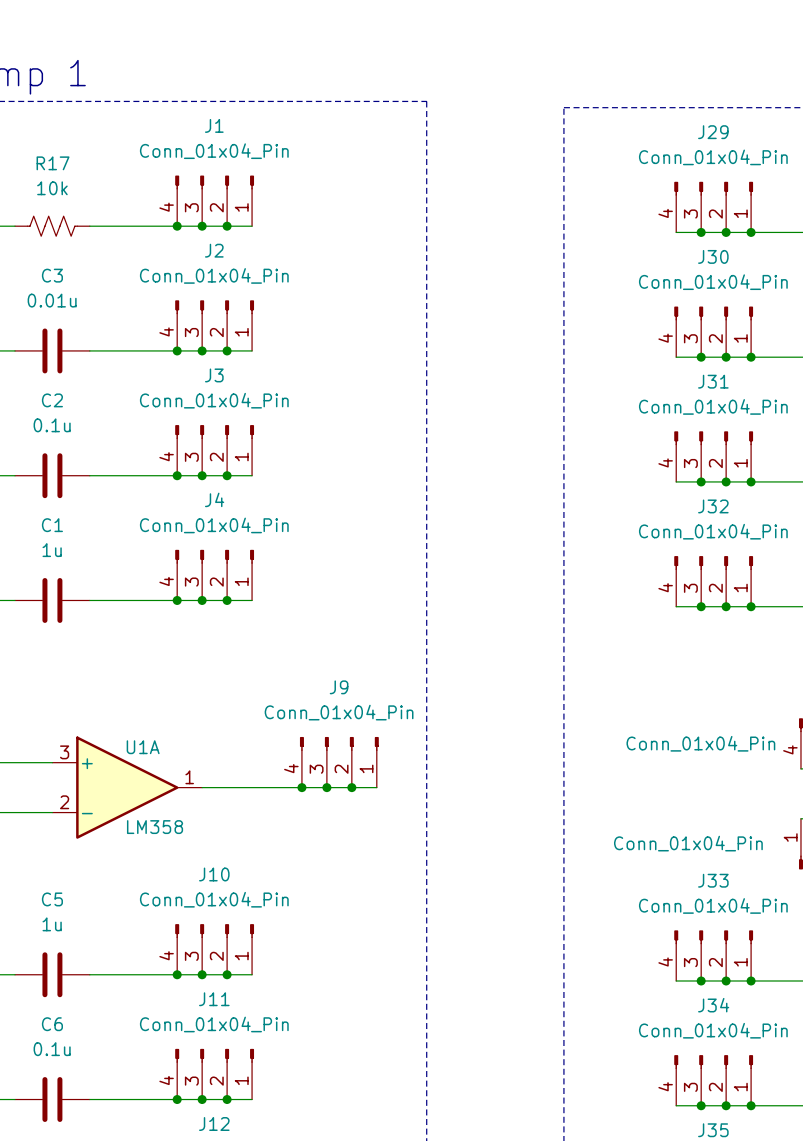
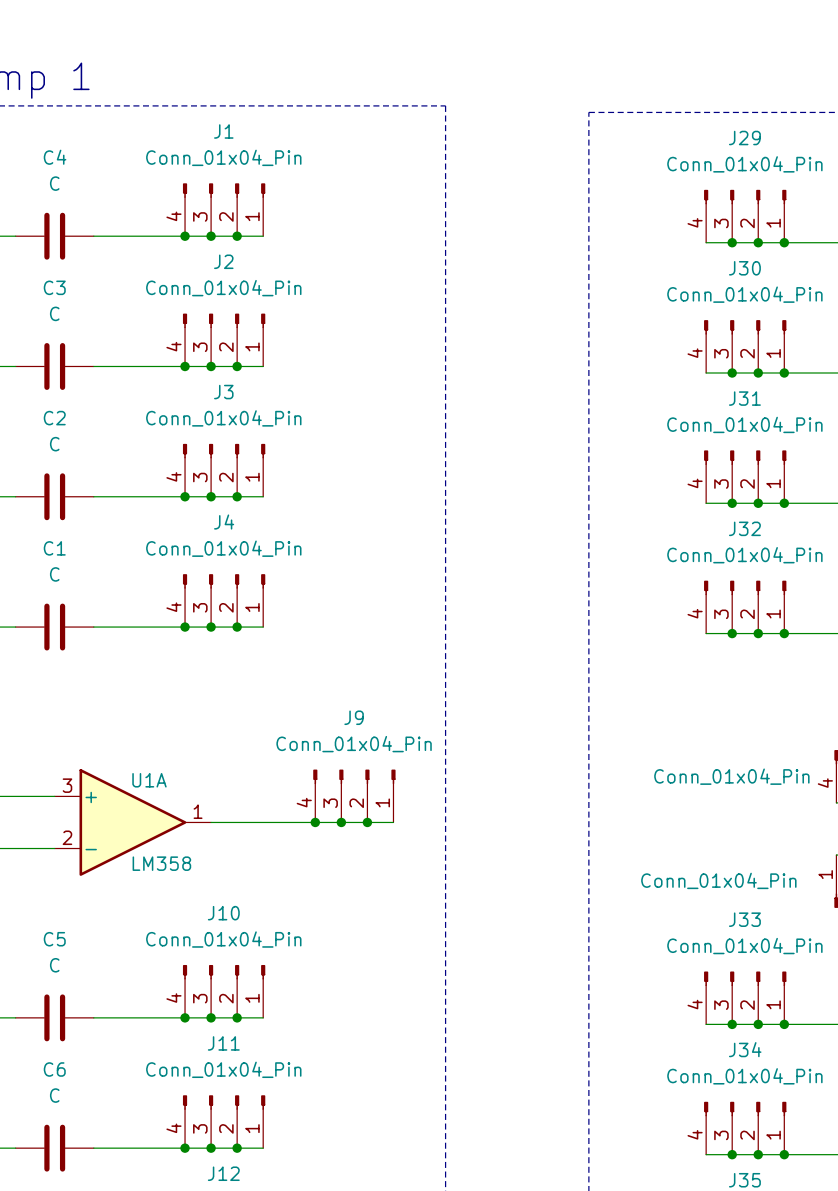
R17: 10k (52, 226) -> none
C4: none -> C (54, 236)
C3 value: 0.01u (52, 300) -> C (54, 313)
C2 value: 0.1u (52, 425) -> C (54, 444)
C1 value: 1u (52, 550) -> C (54, 574)
C5 value: 1u (52, 924) -> C (54, 965)
C6 value: 0.1u (52, 1049) -> C (54, 1095)

